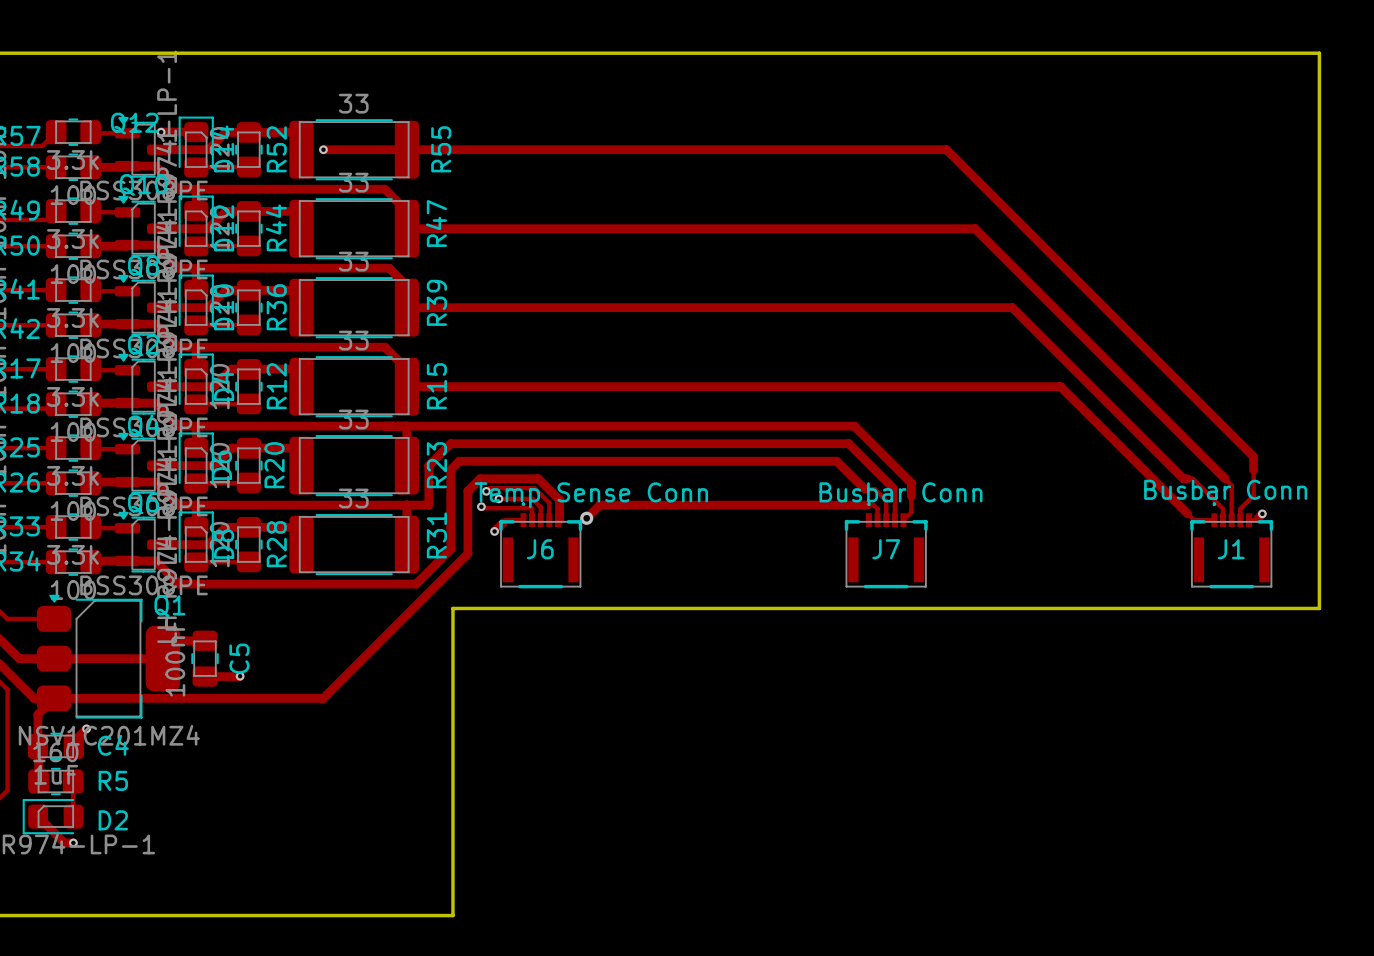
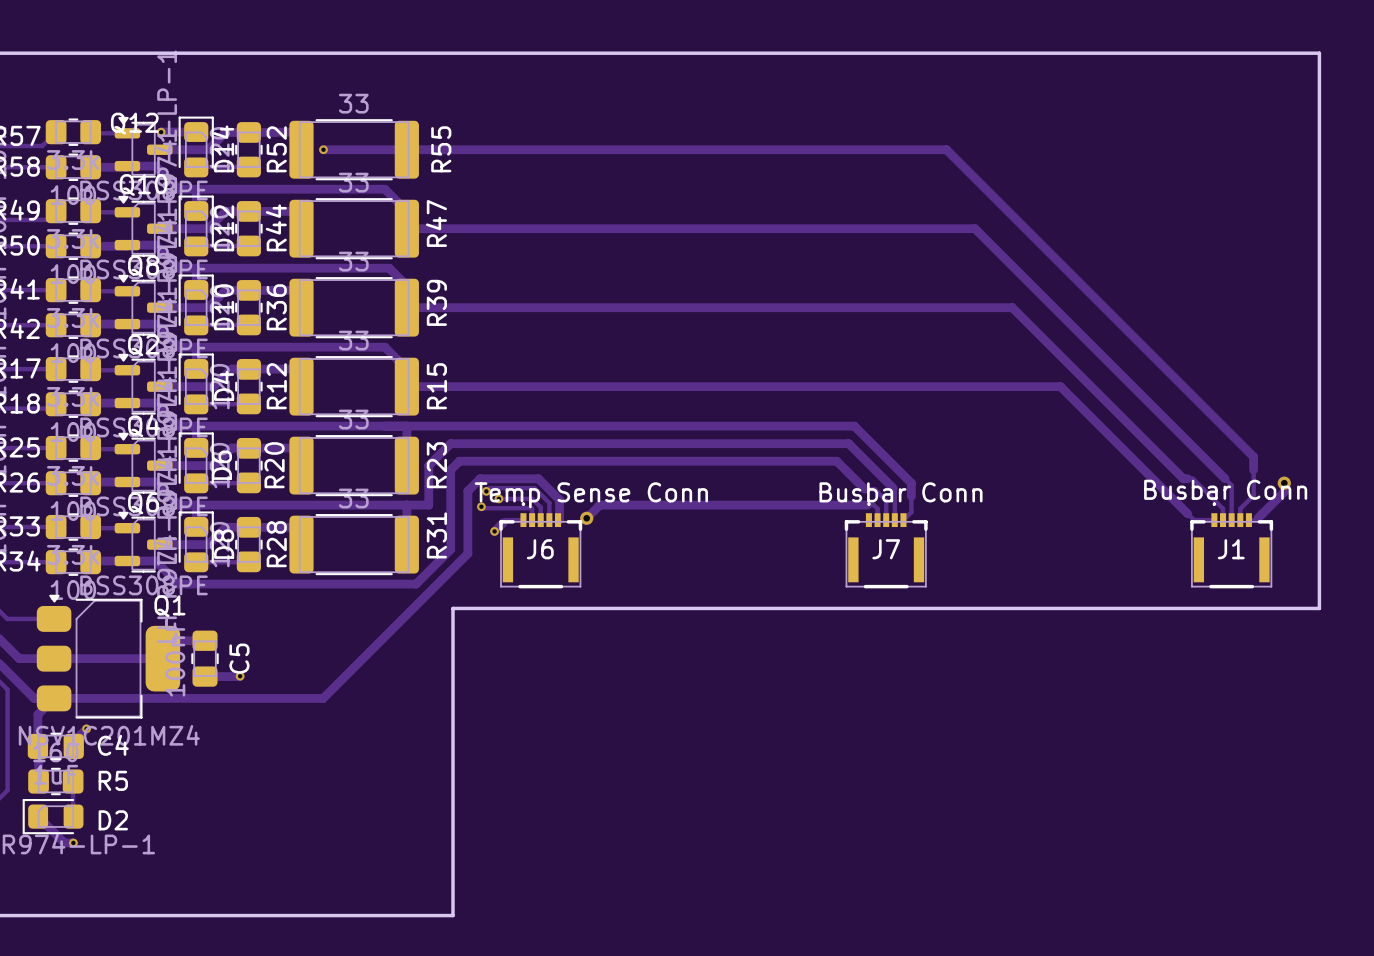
track: none -> (1284, 483) (1284, 491) (1262, 513)
via: none -> (1284, 483)
via: (1262, 513) -> none

